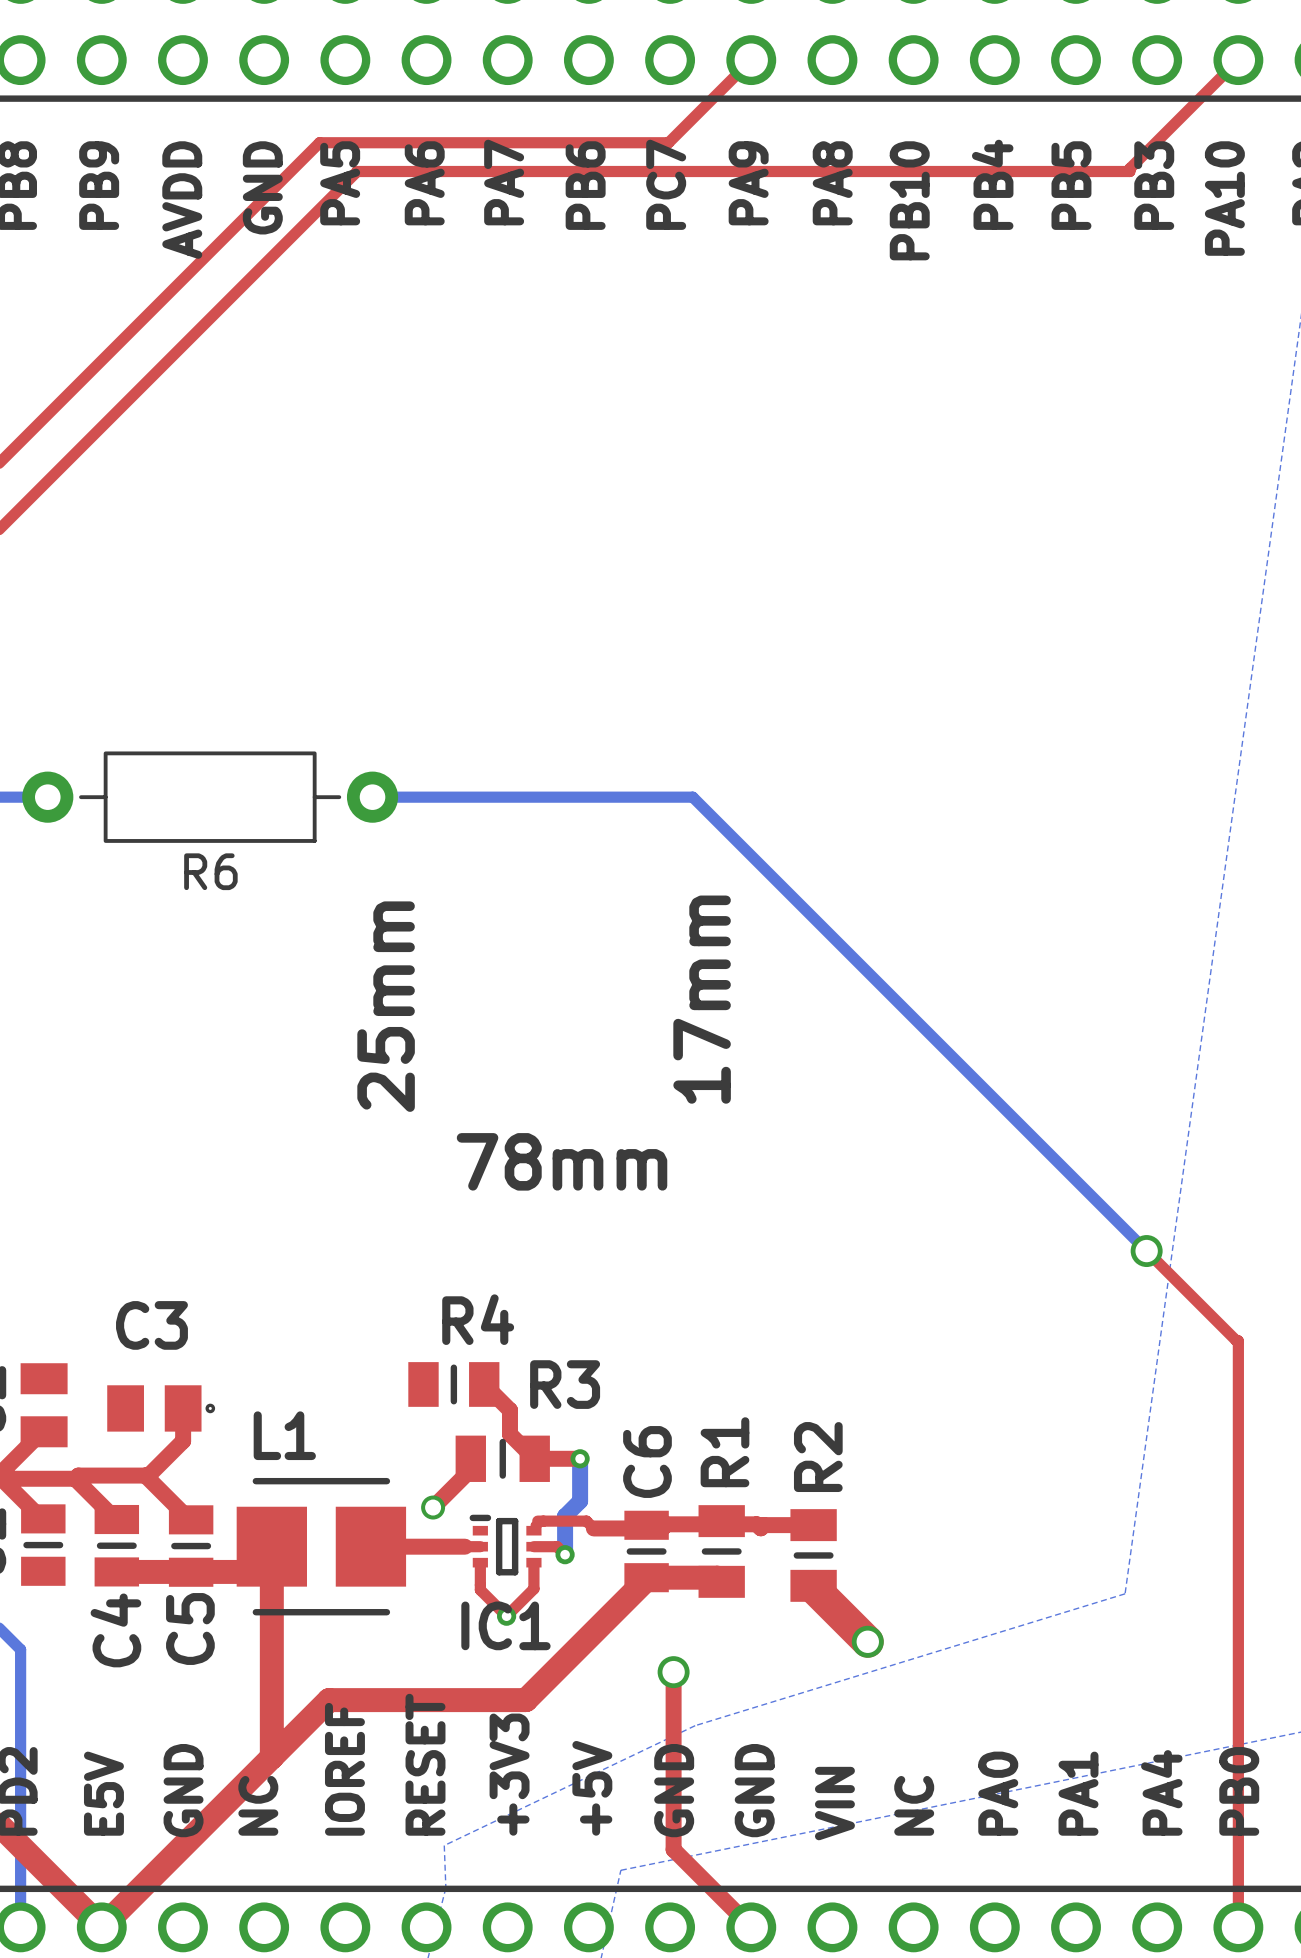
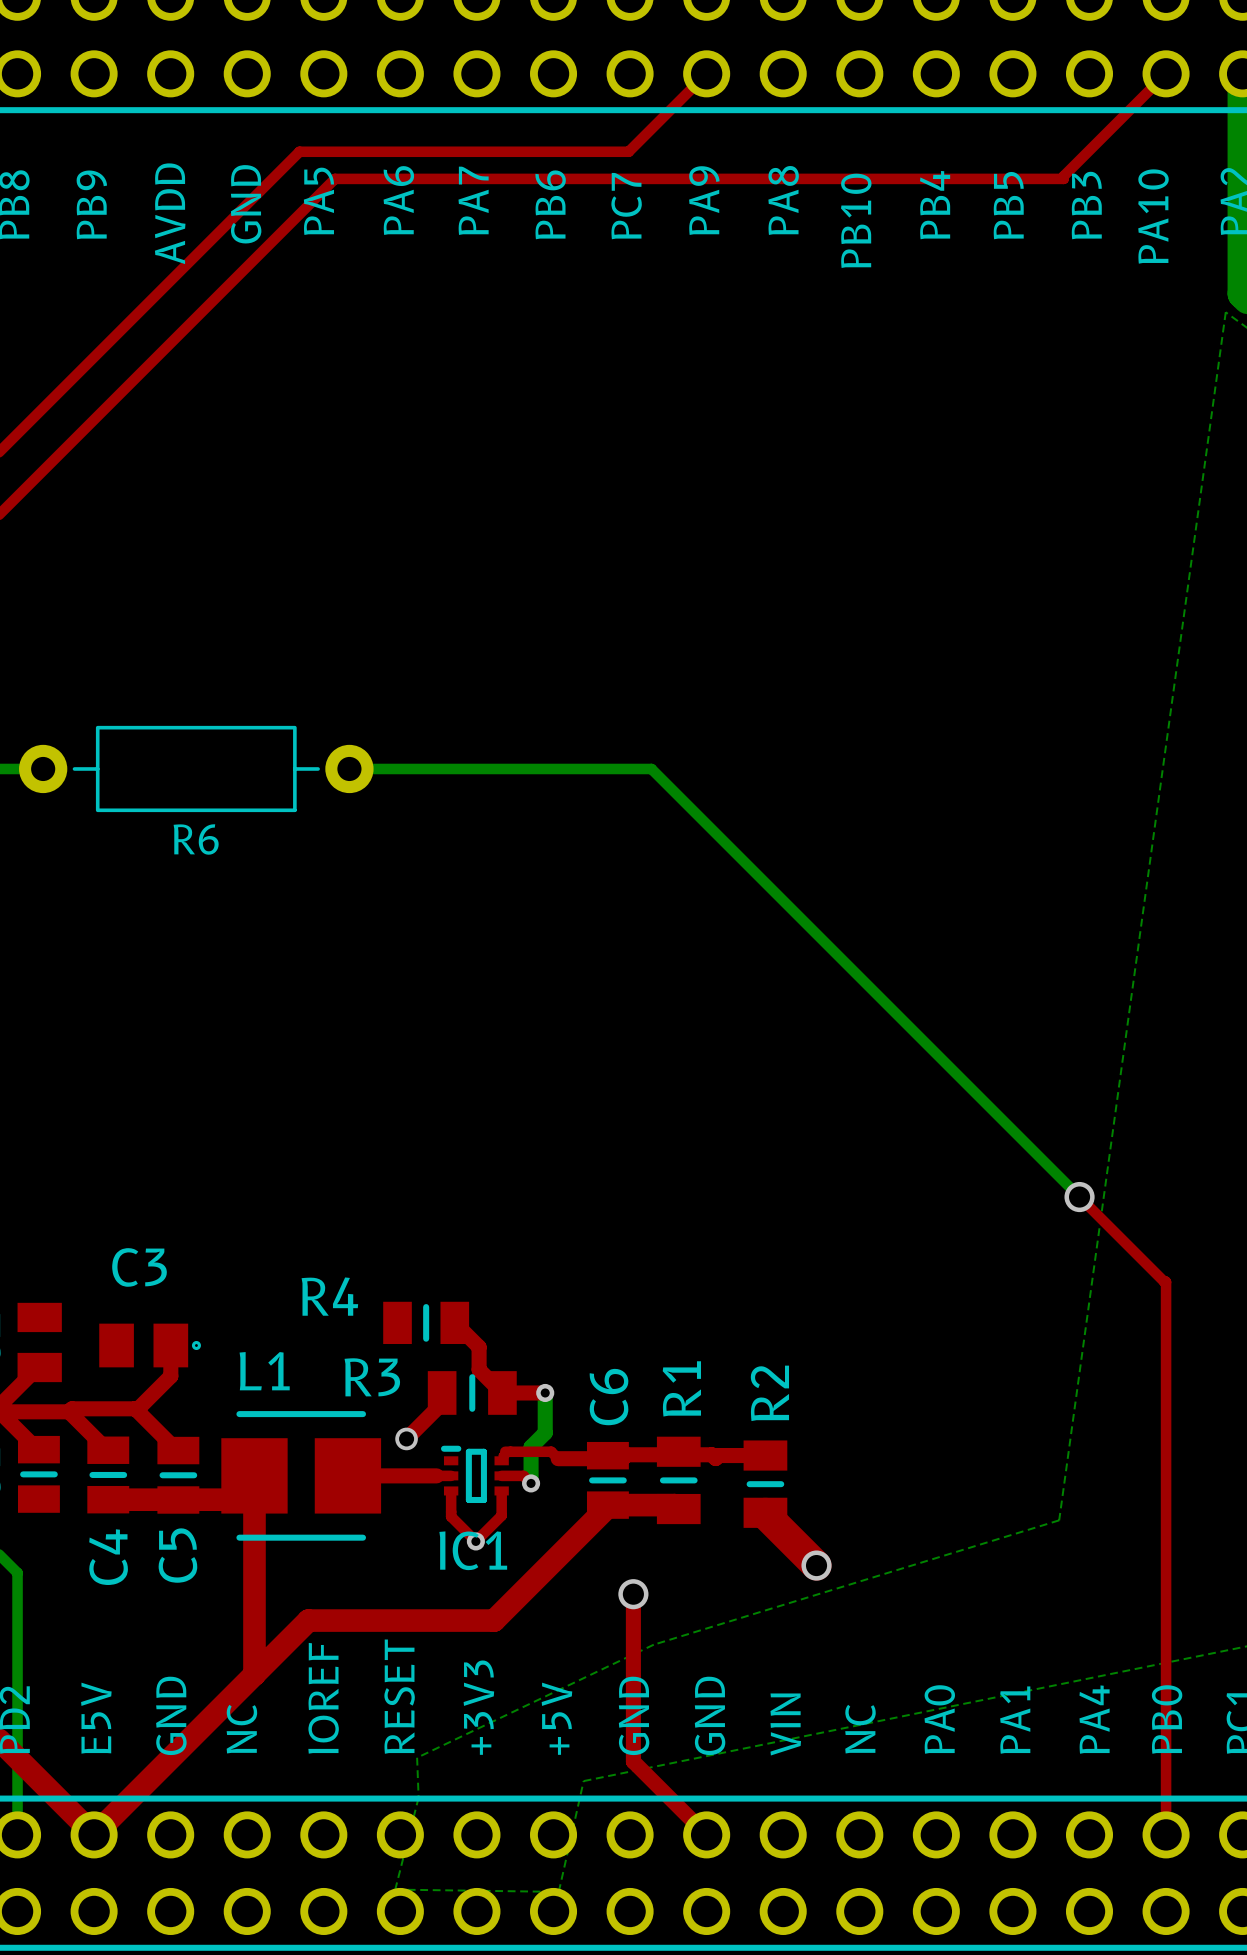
text: 17mm (702, 999) -> none
text: 25mm (386, 1006) -> none
text: 78mm (562, 1161) -> none
R4 name position: R4 (478, 1319) -> R4 (329, 1296)
R3 name position: R3 (565, 1384) -> R3 (372, 1377)

